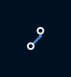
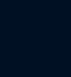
track: (40, 30) (40, 36) (30, 46) -> none
via: (40, 30) -> none
via: (30, 46) -> none

